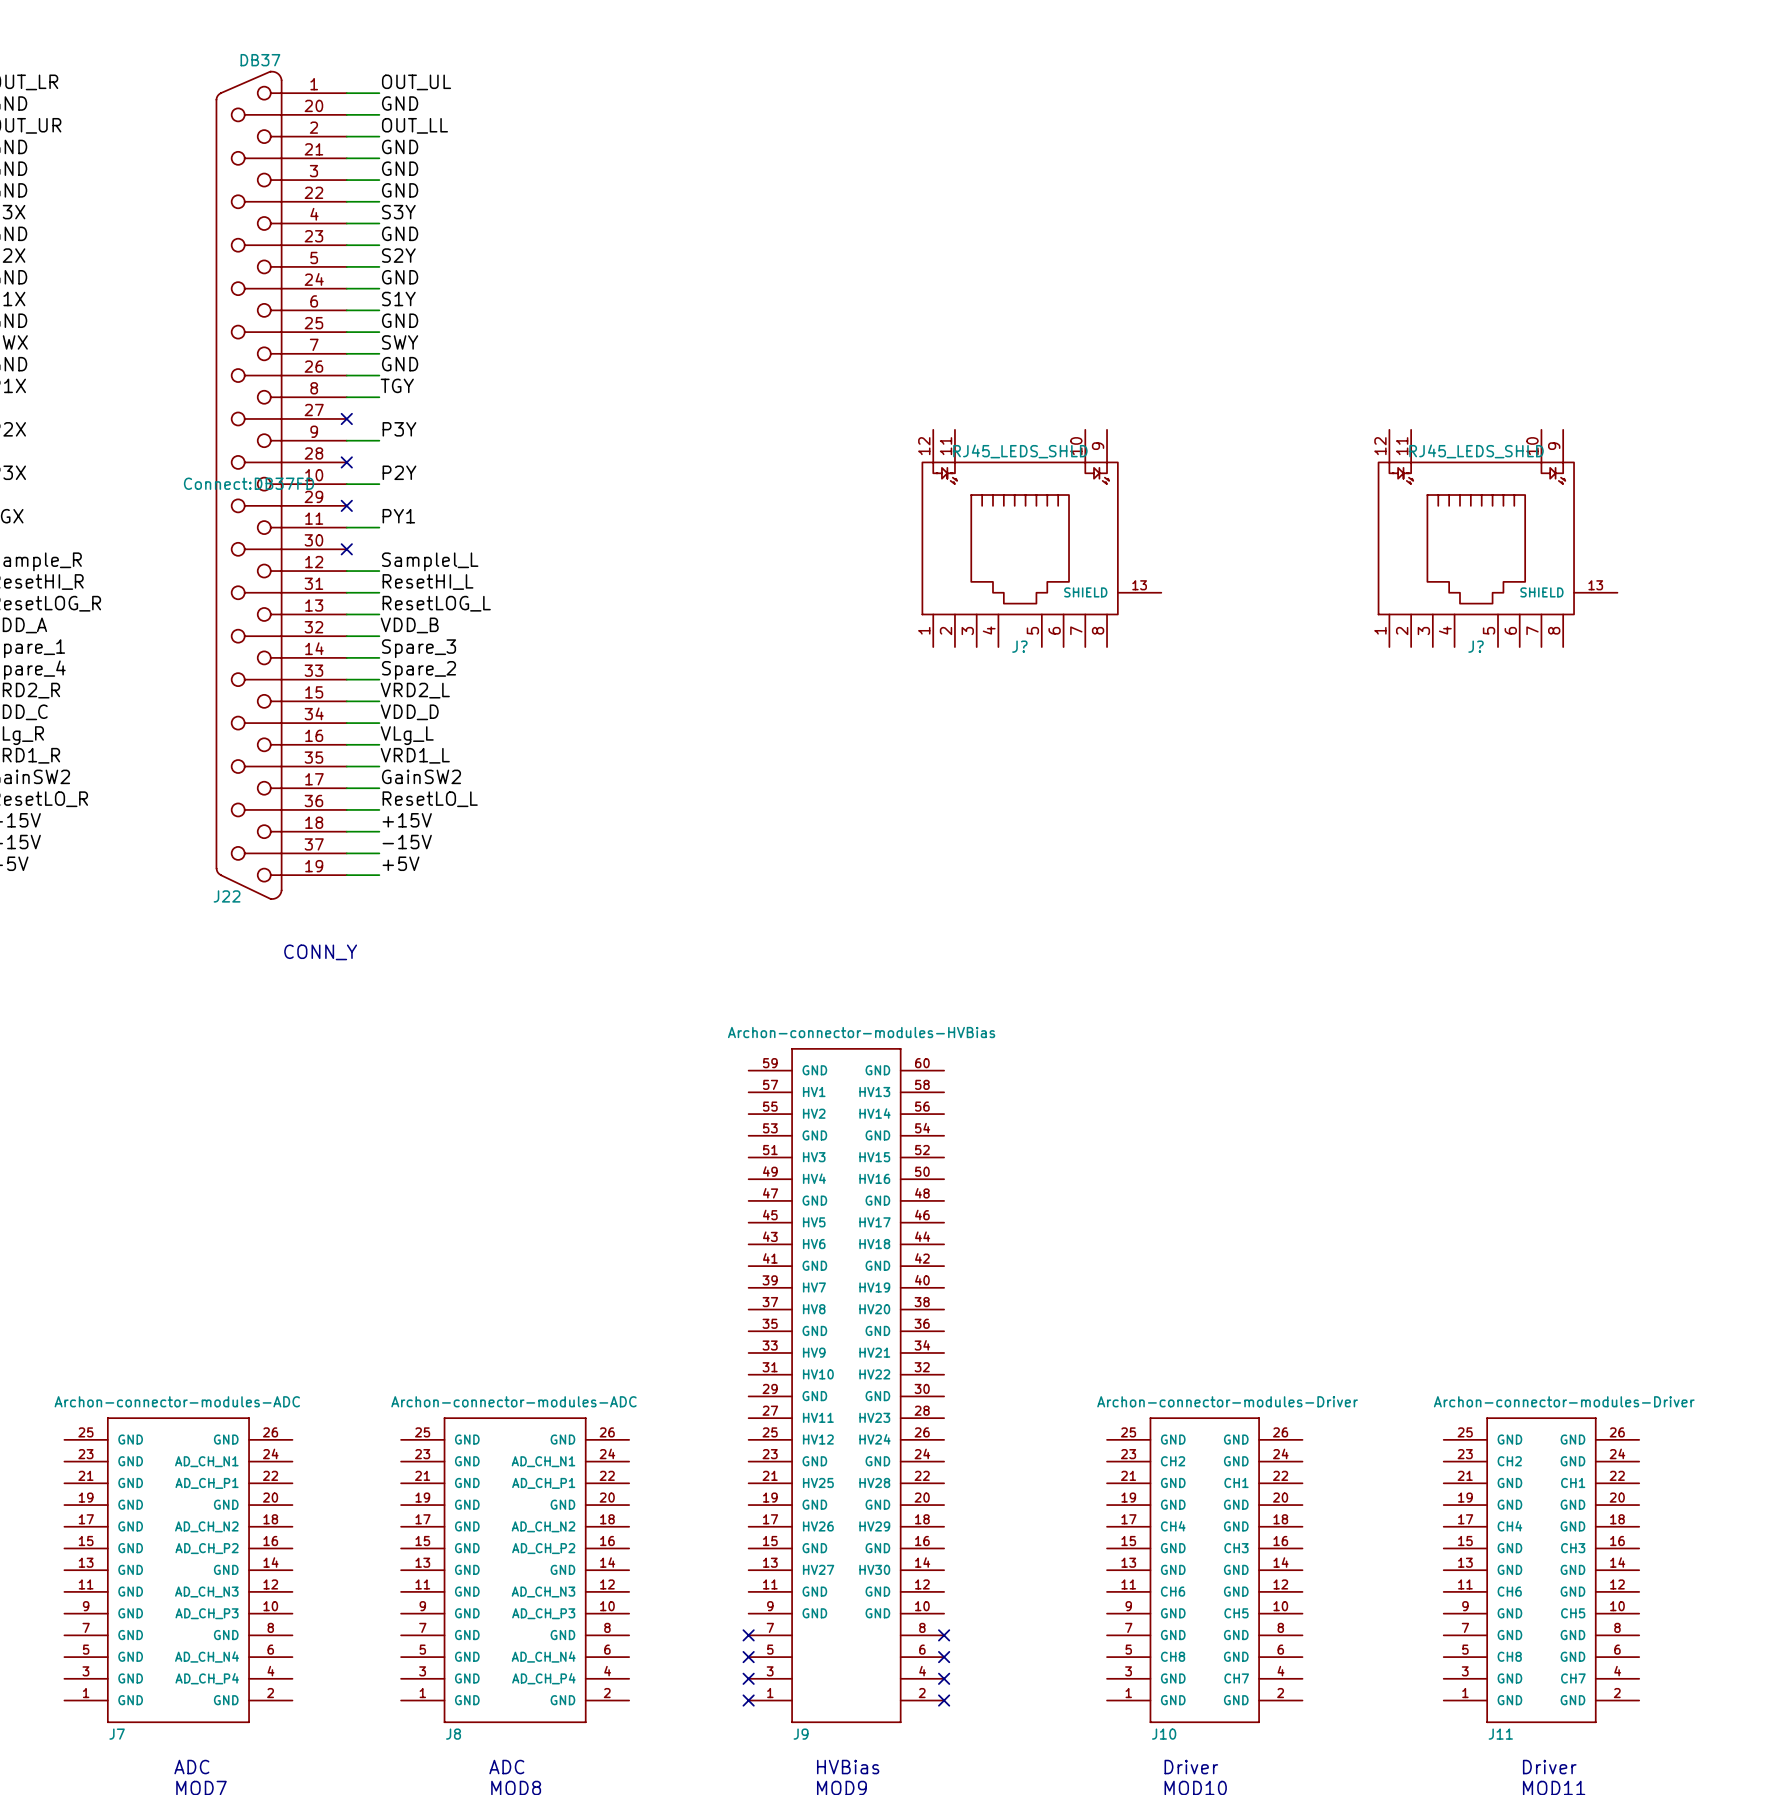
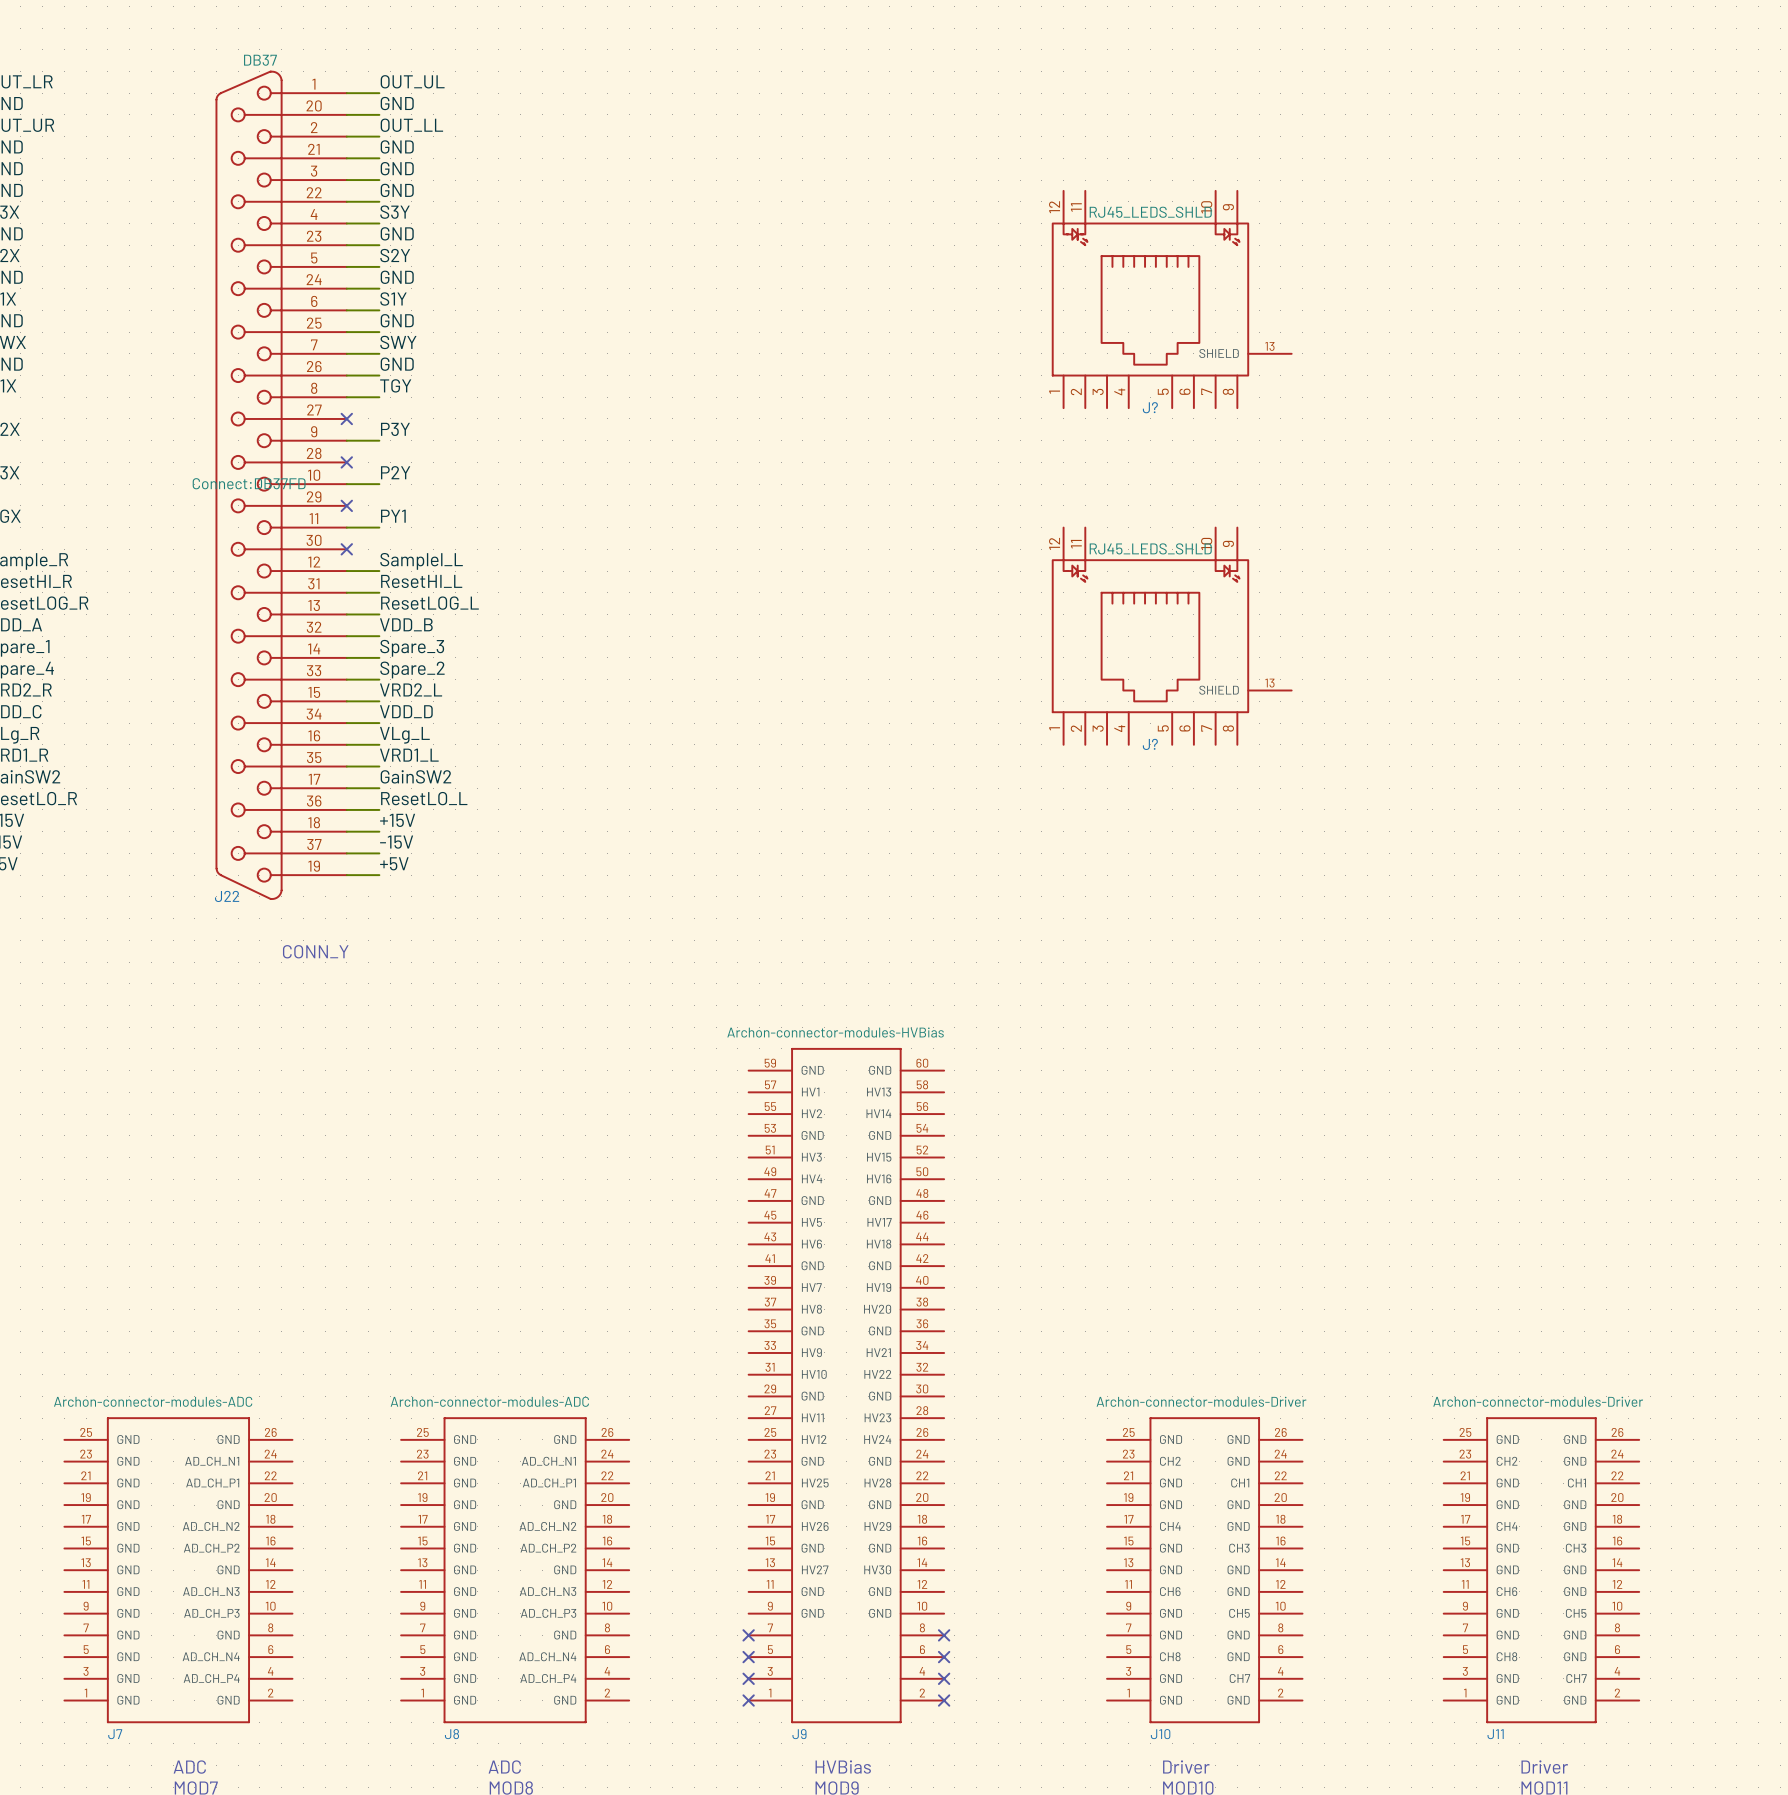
J?: none -> RJ45_LEDS_SHLD (1172, 299)
J?: RJ45_LEDS_SHLD (1041, 538) -> none
J?: RJ45_LEDS_SHLD (1498, 538) -> none
J?: none -> RJ45_LEDS_SHLD (1172, 636)

